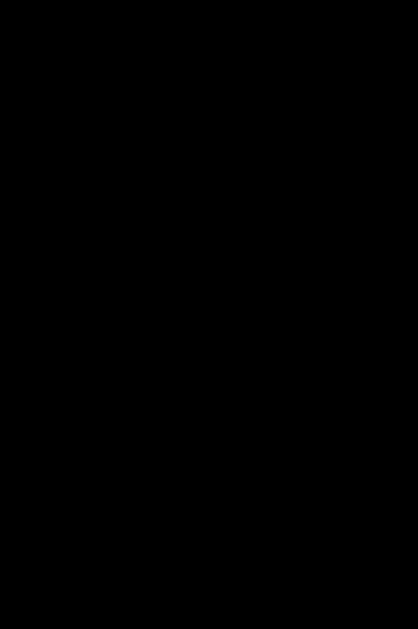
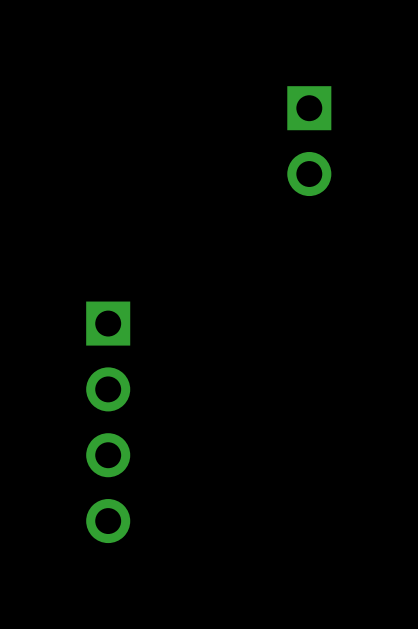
part: none -> (309, 141)
part: none -> (108, 422)

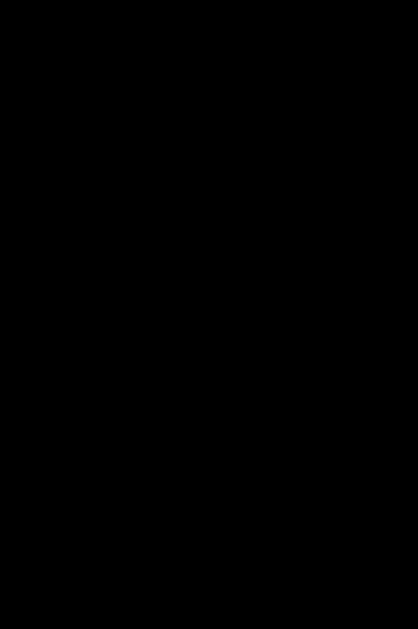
part: (309, 141) -> none
part: (108, 422) -> none

